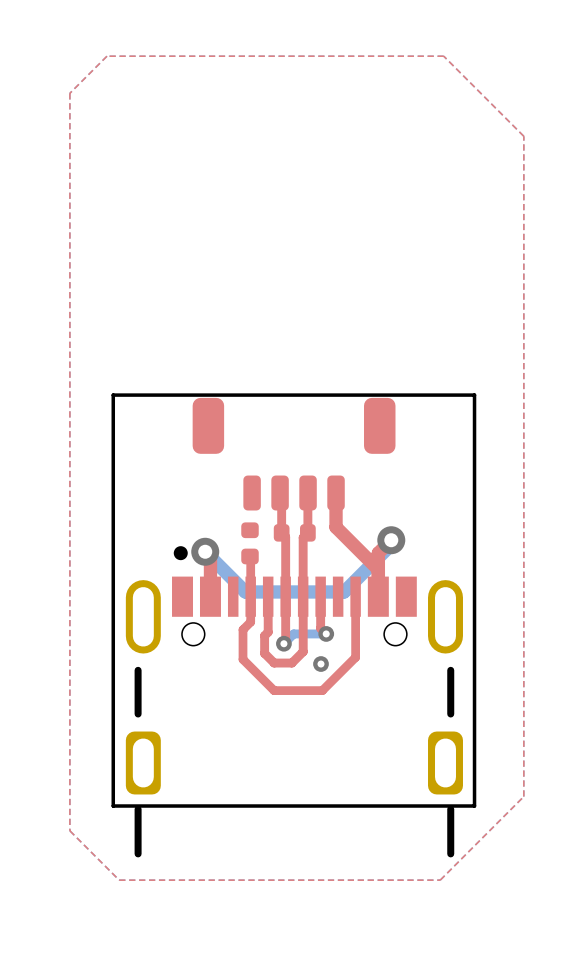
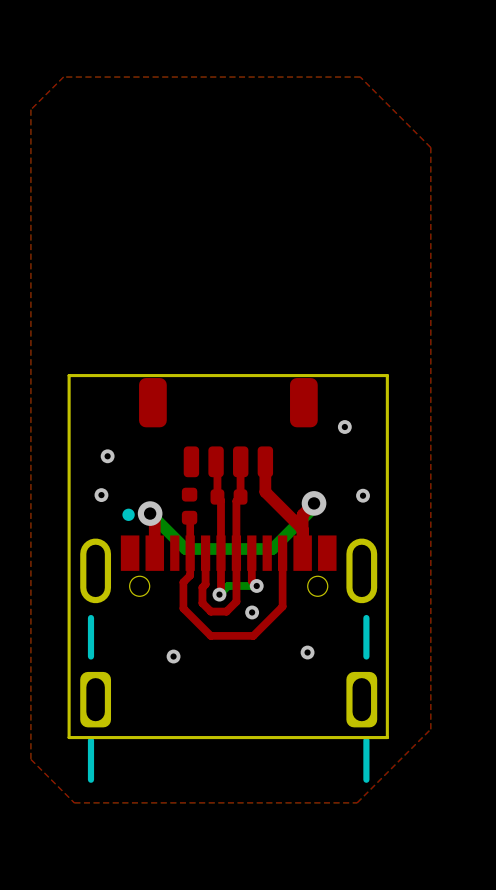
via: none -> (344, 427)
via: none -> (107, 456)
via: none -> (101, 495)
via: none -> (363, 495)
via: none -> (307, 652)
via: none -> (173, 656)

